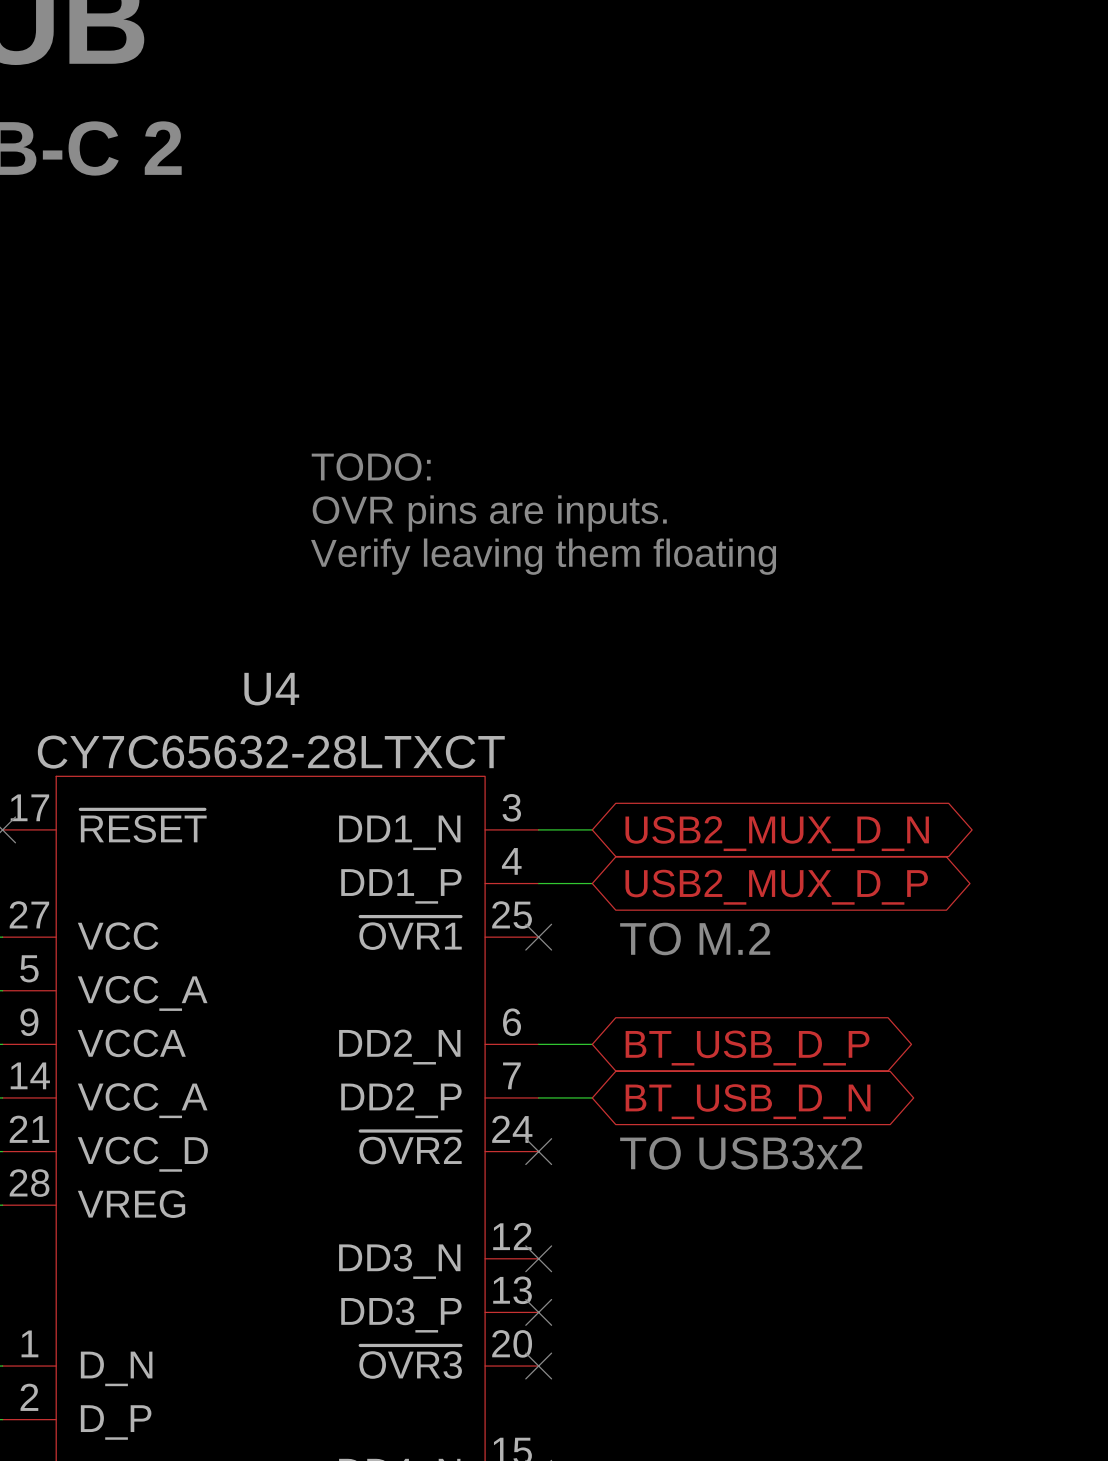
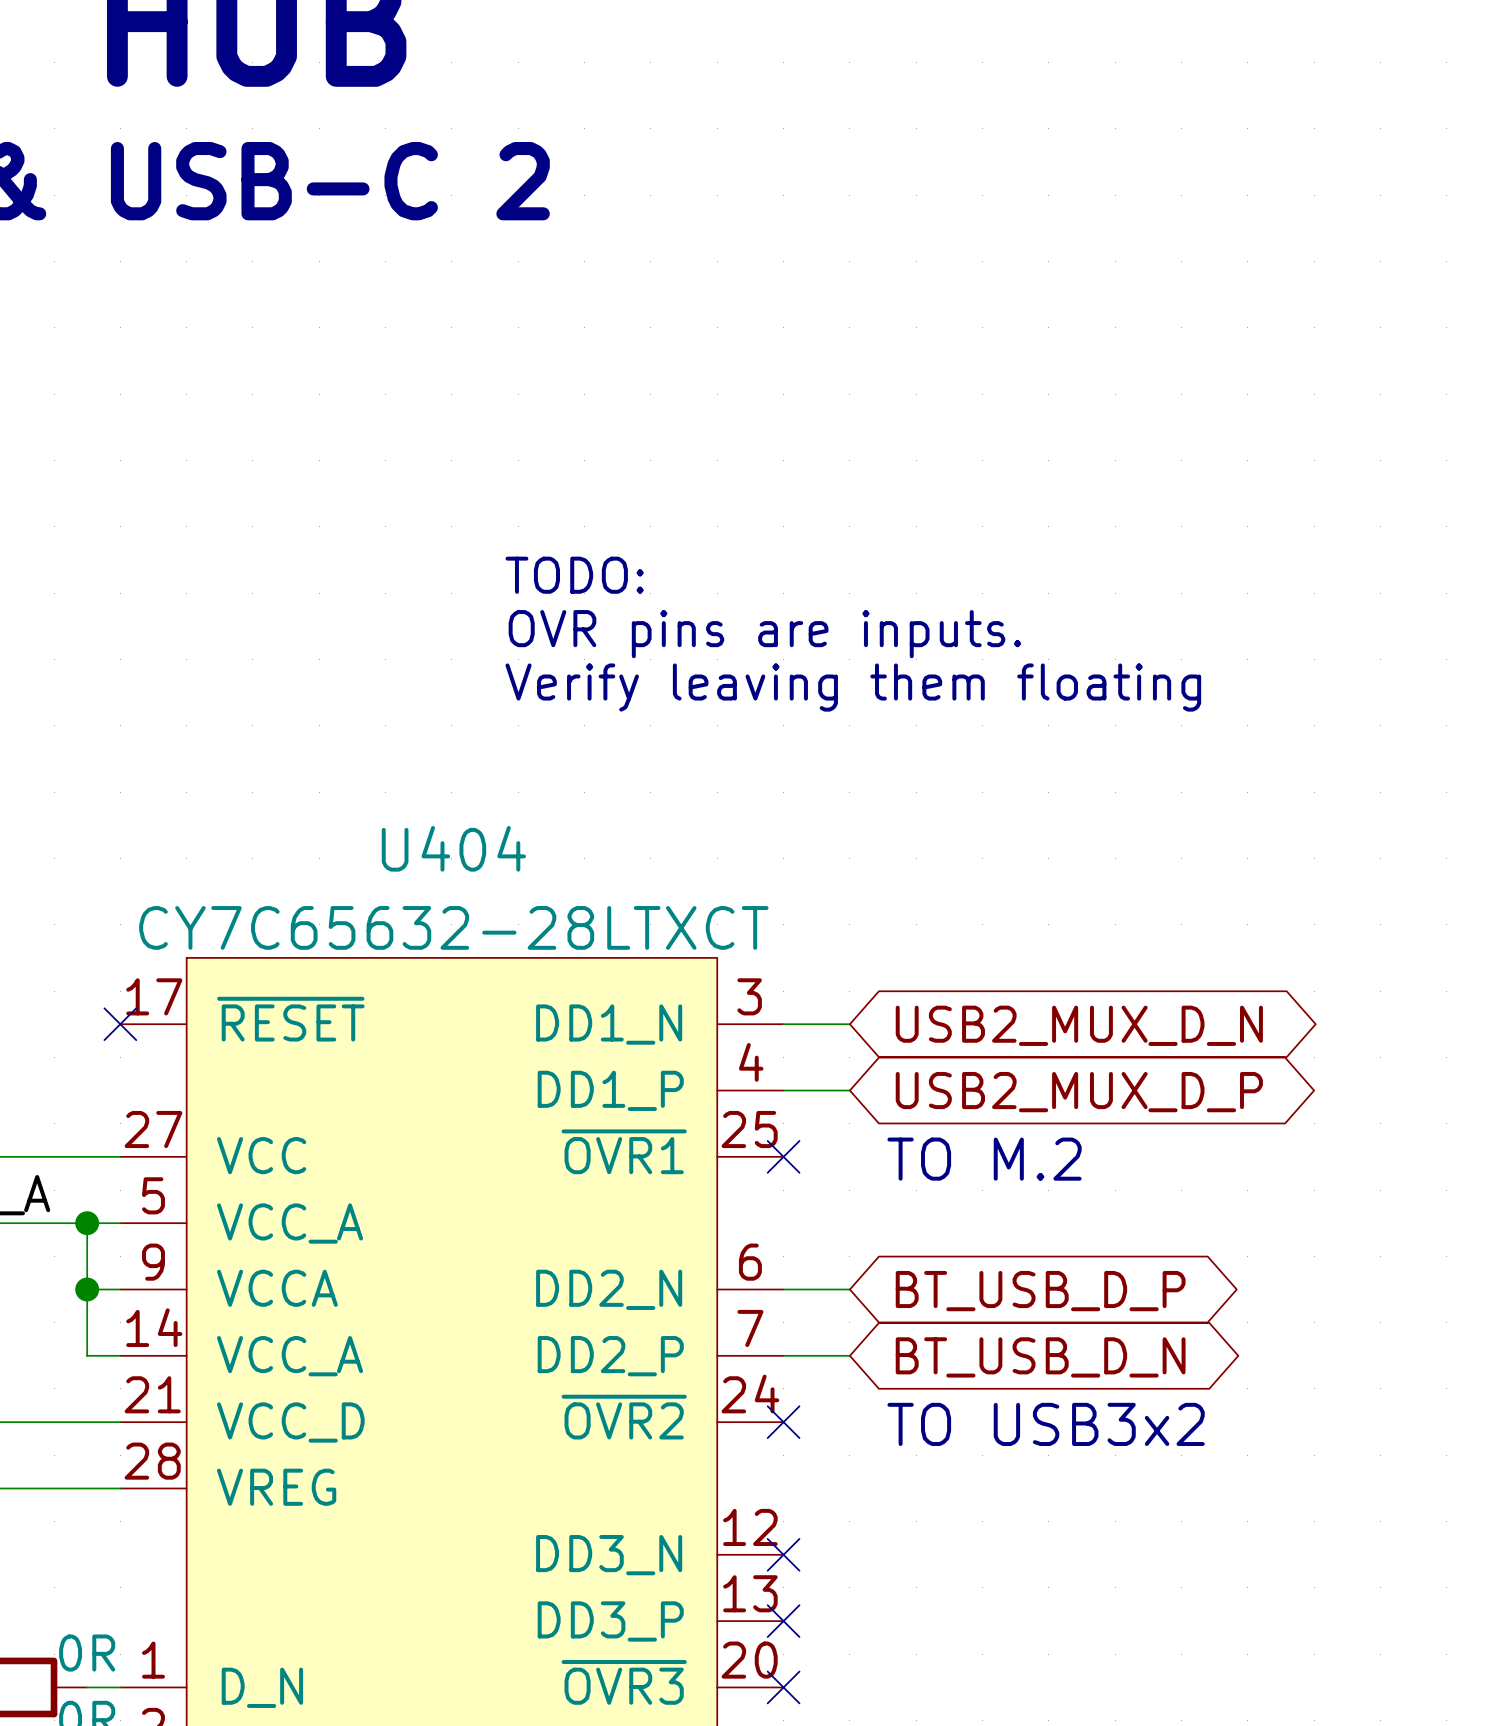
U4 name: U4 (271, 689) -> U404 (453, 848)

